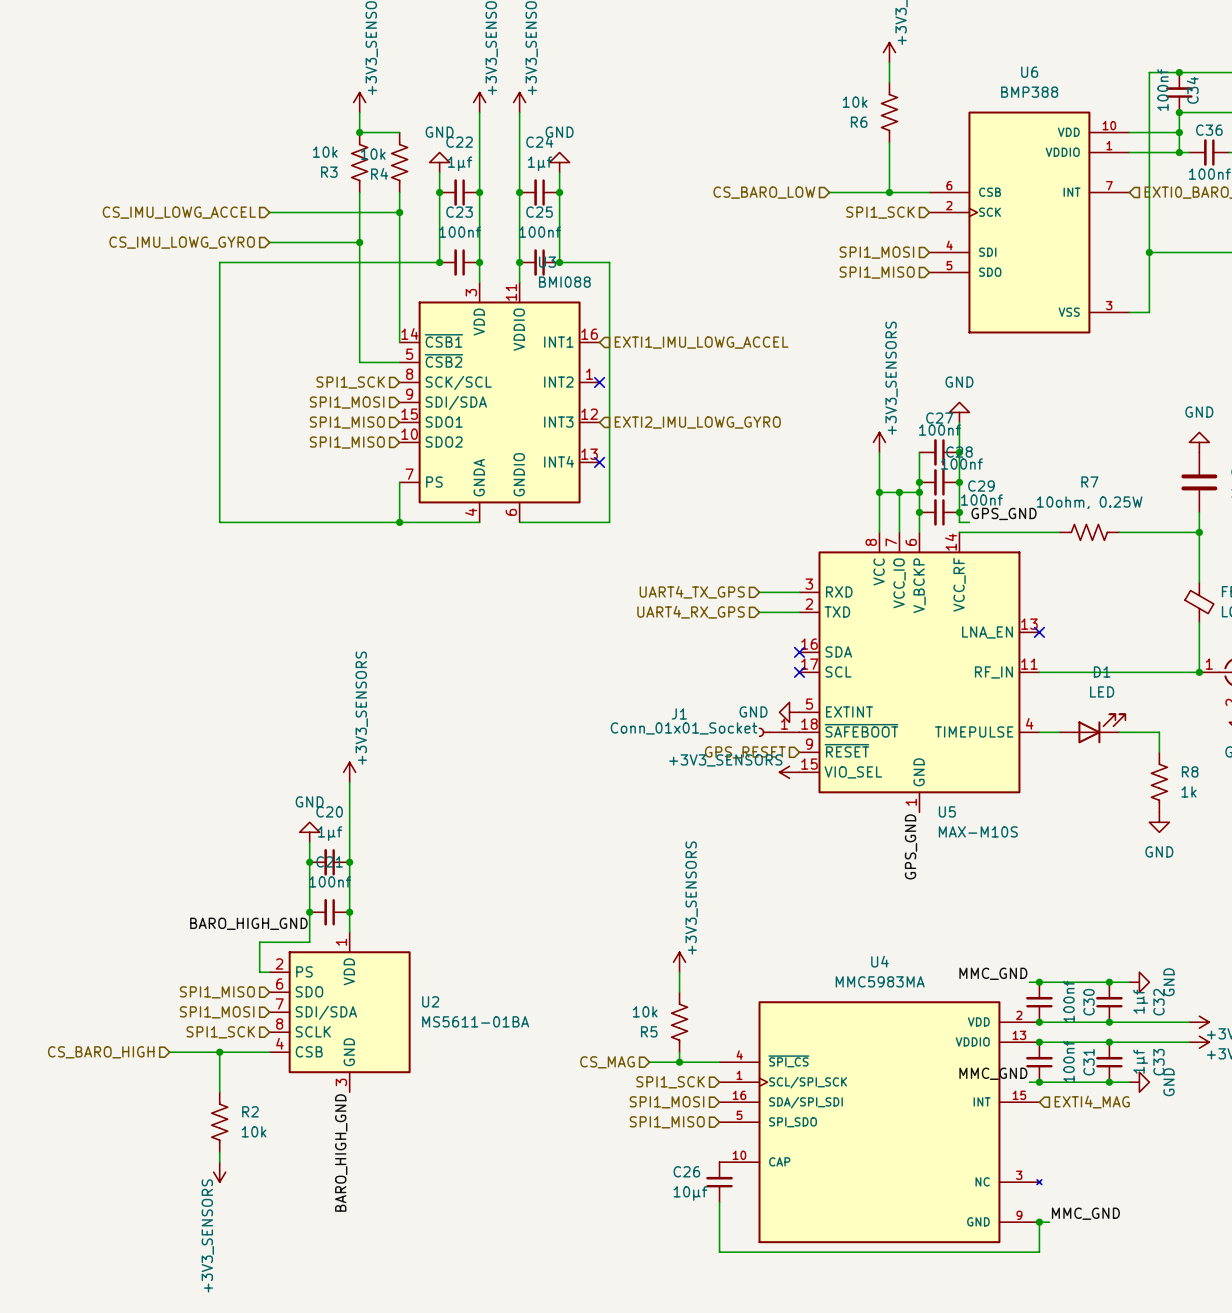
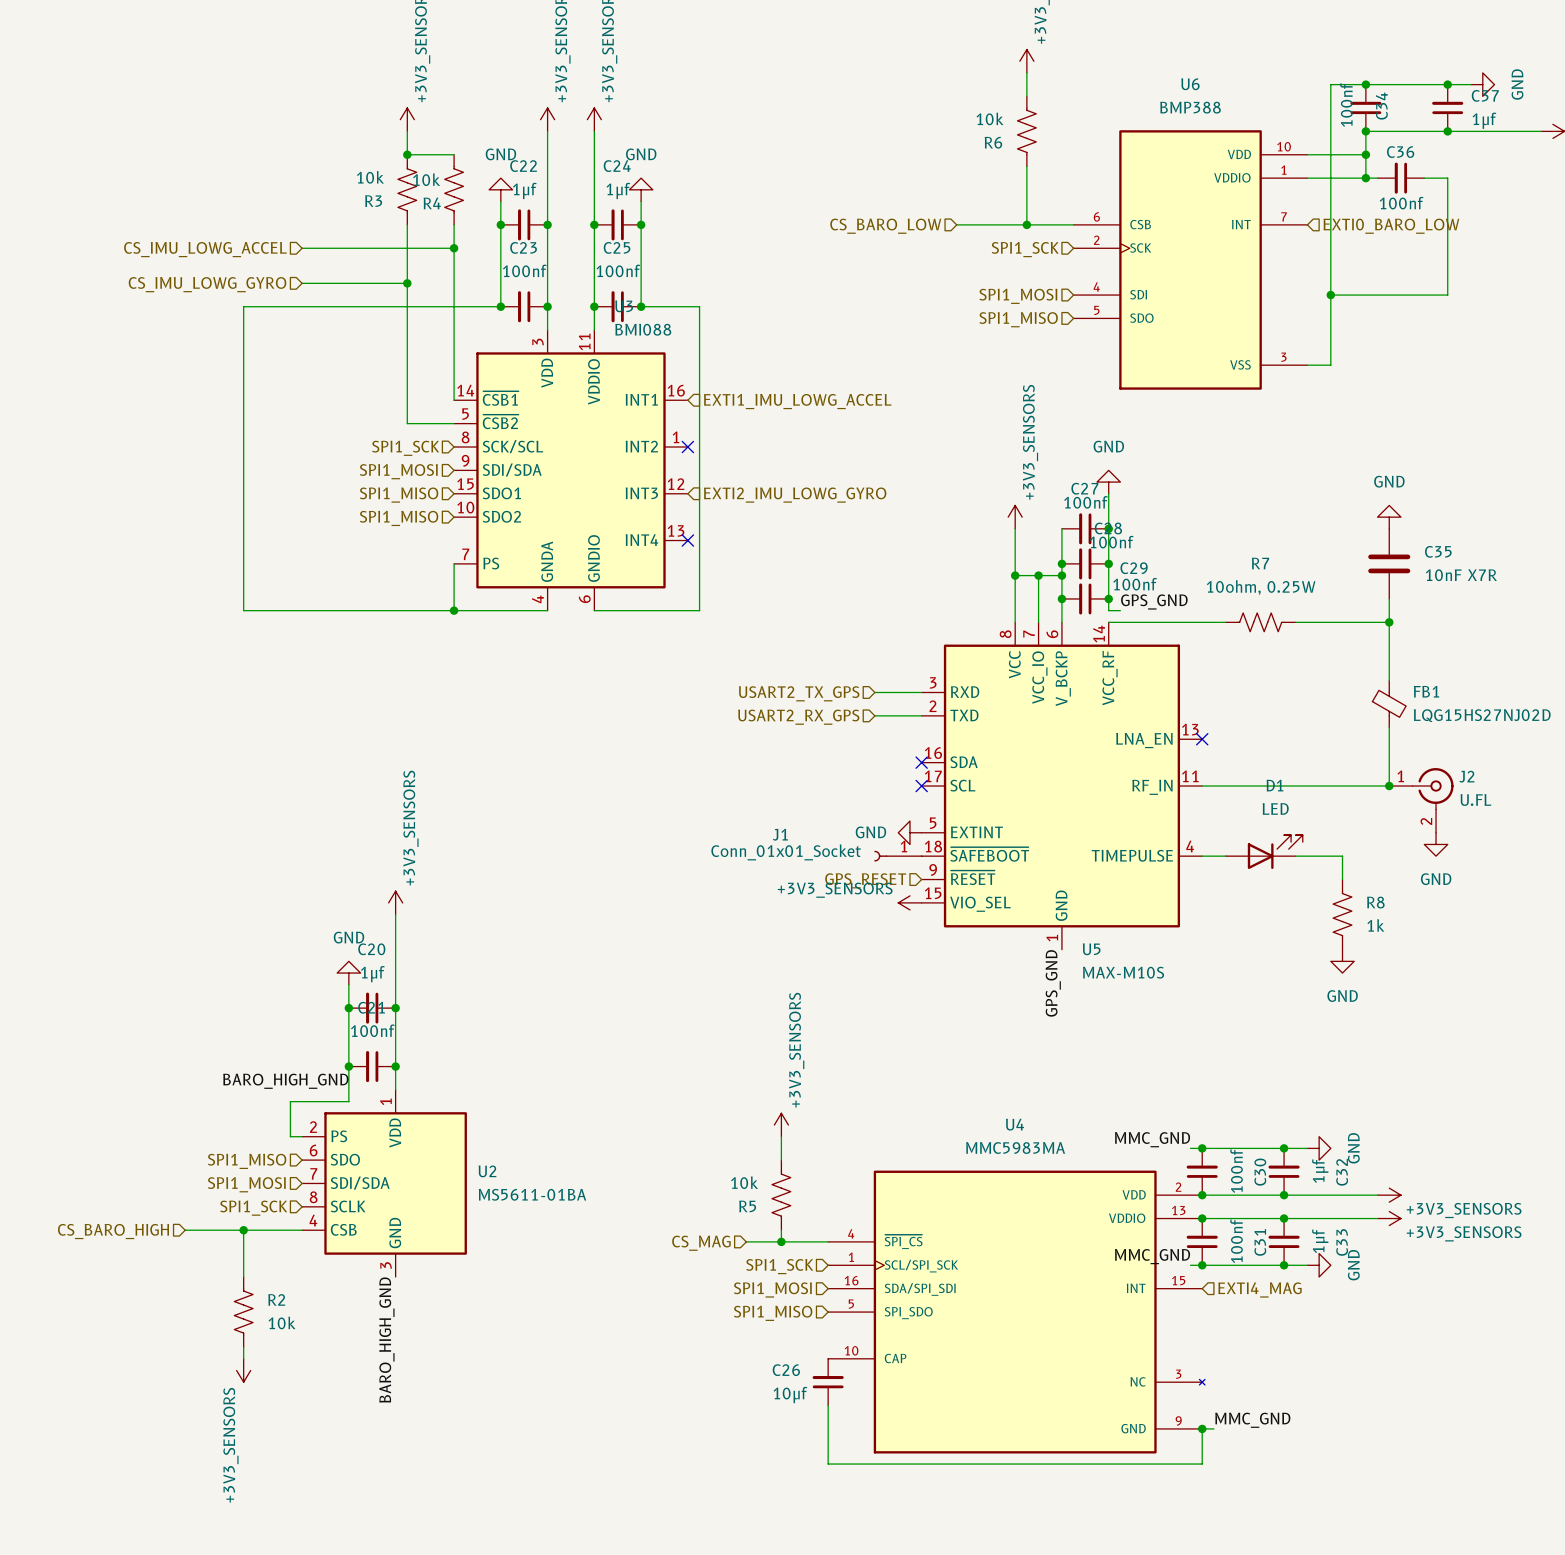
hierarchical label: UART4_TX_GPS (692, 592) -> USART2_TX_GPS (799, 693)
hierarchical label: UART4_RX_GPS (691, 612) -> USART2_RX_GPS (798, 717)

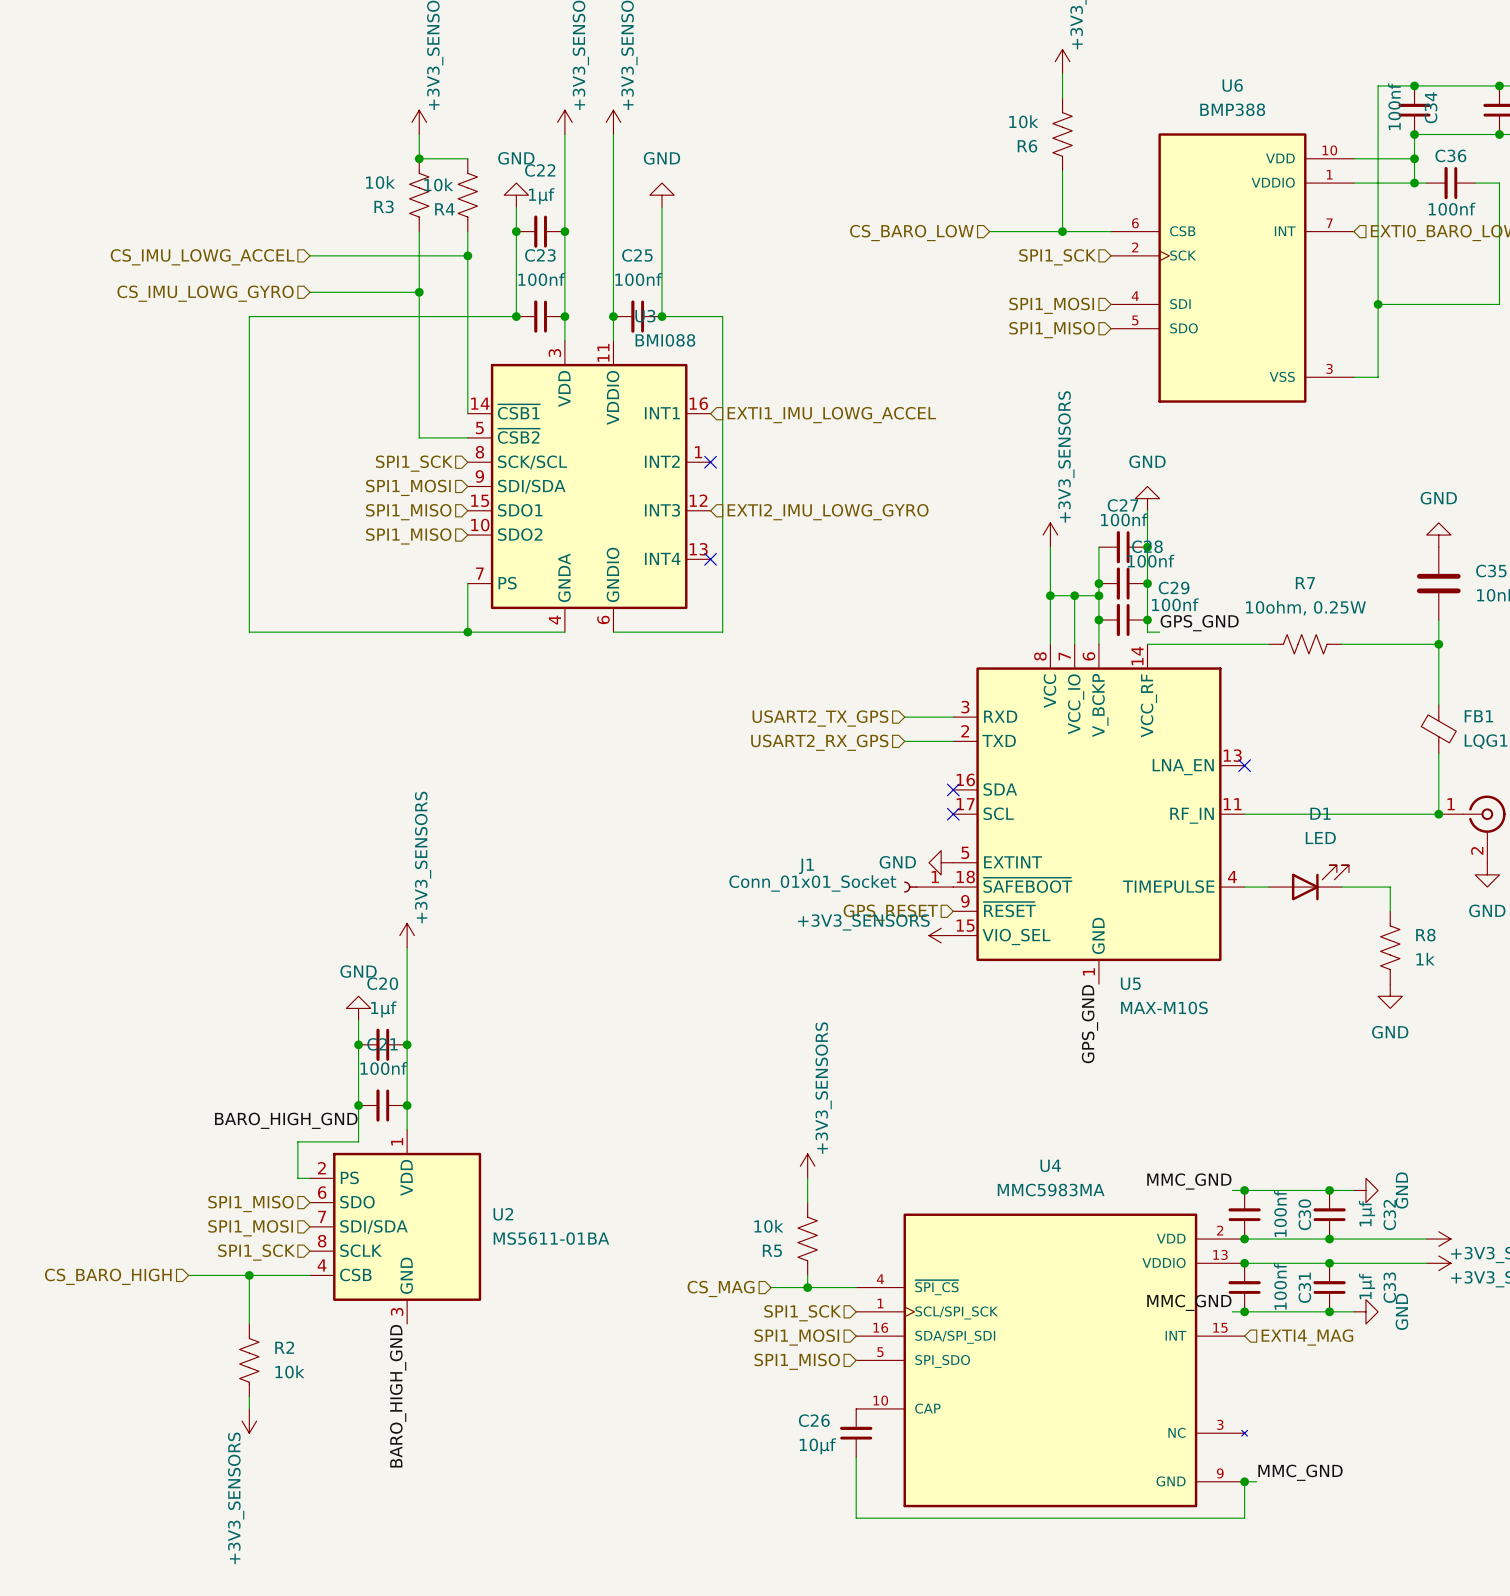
junction: (594, 224) -> none
C24: 1μf (617, 224) -> none
junction: (641, 224) -> none

